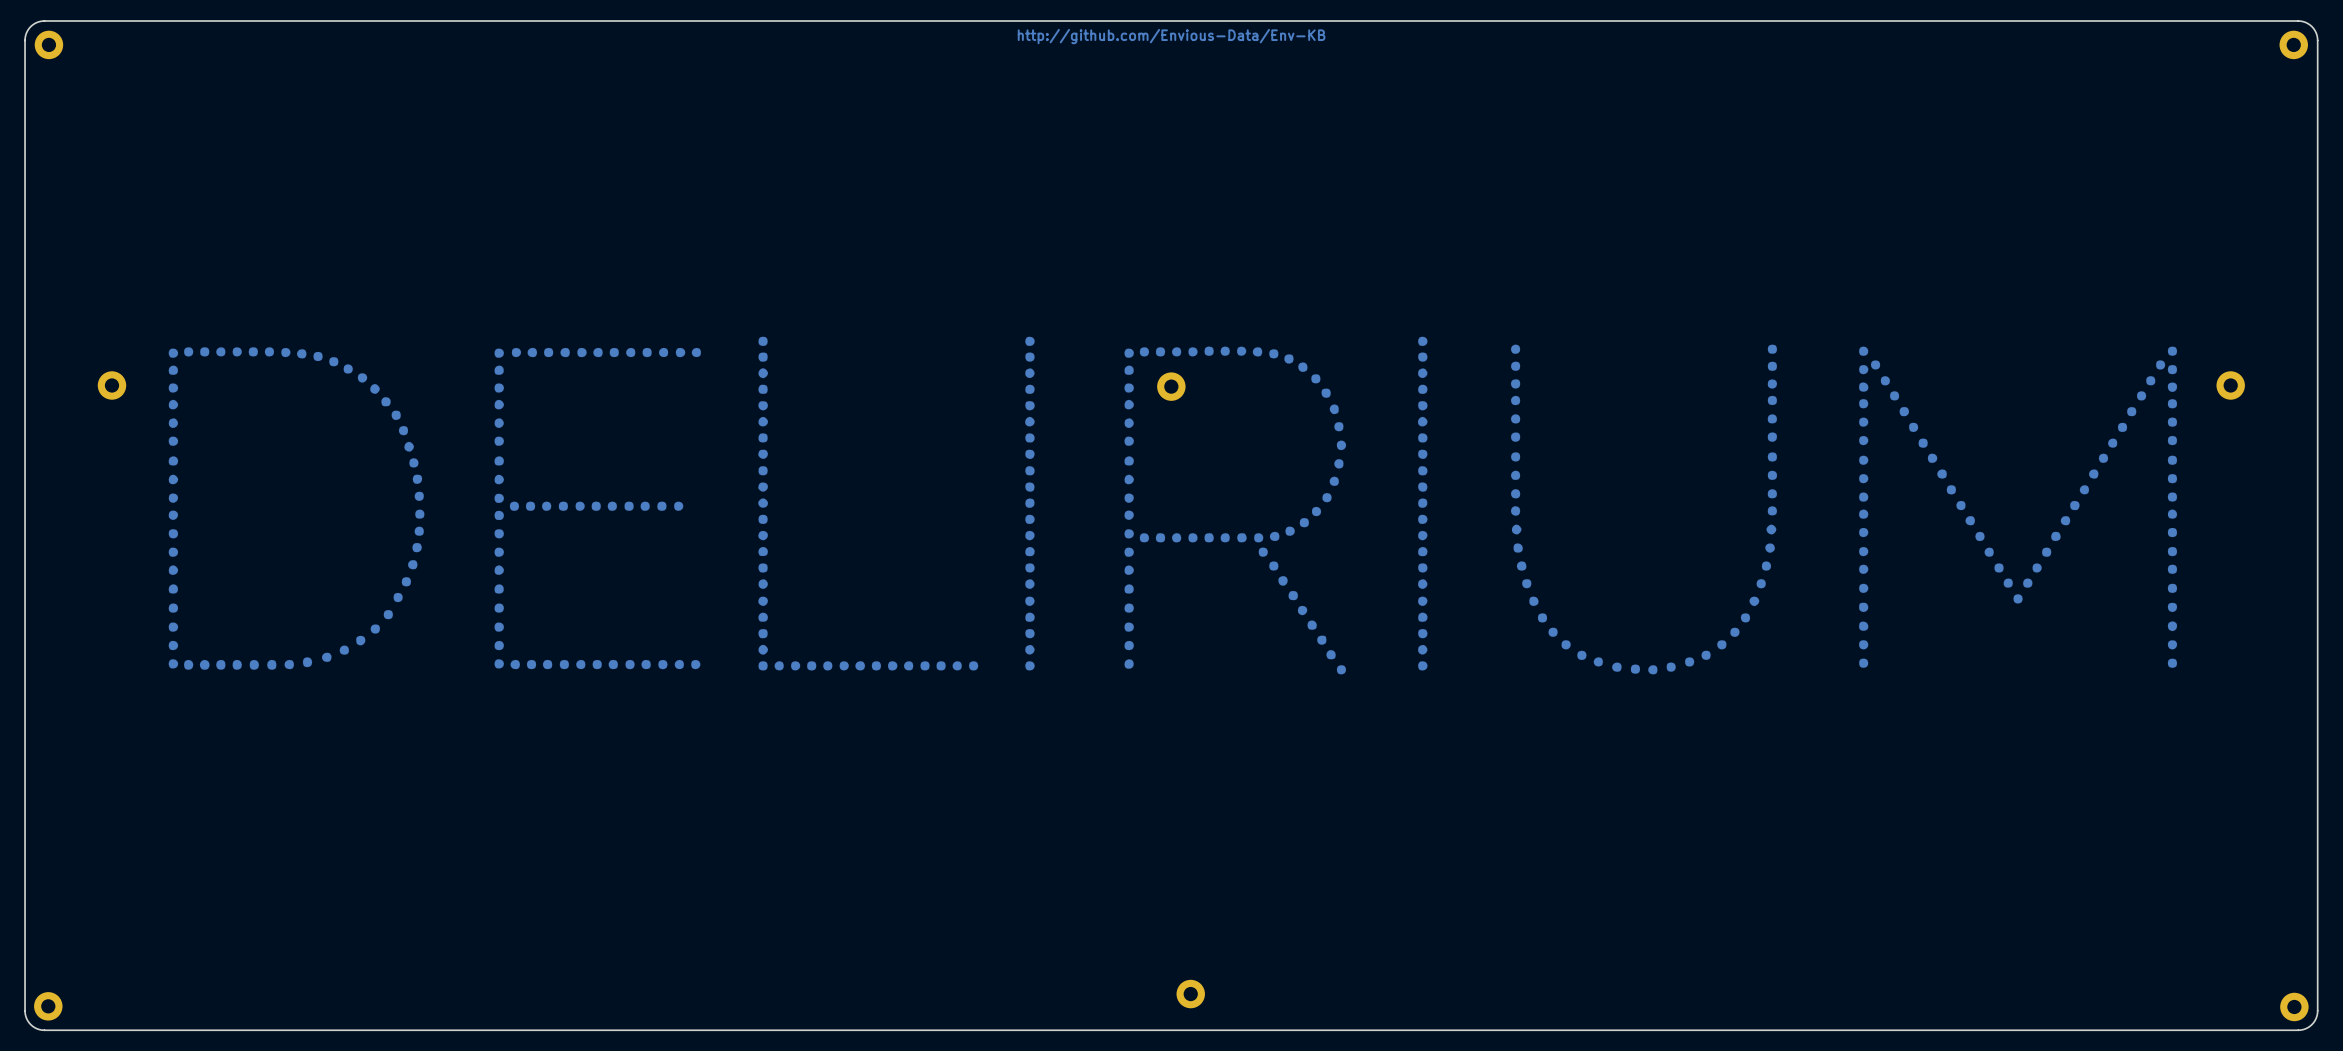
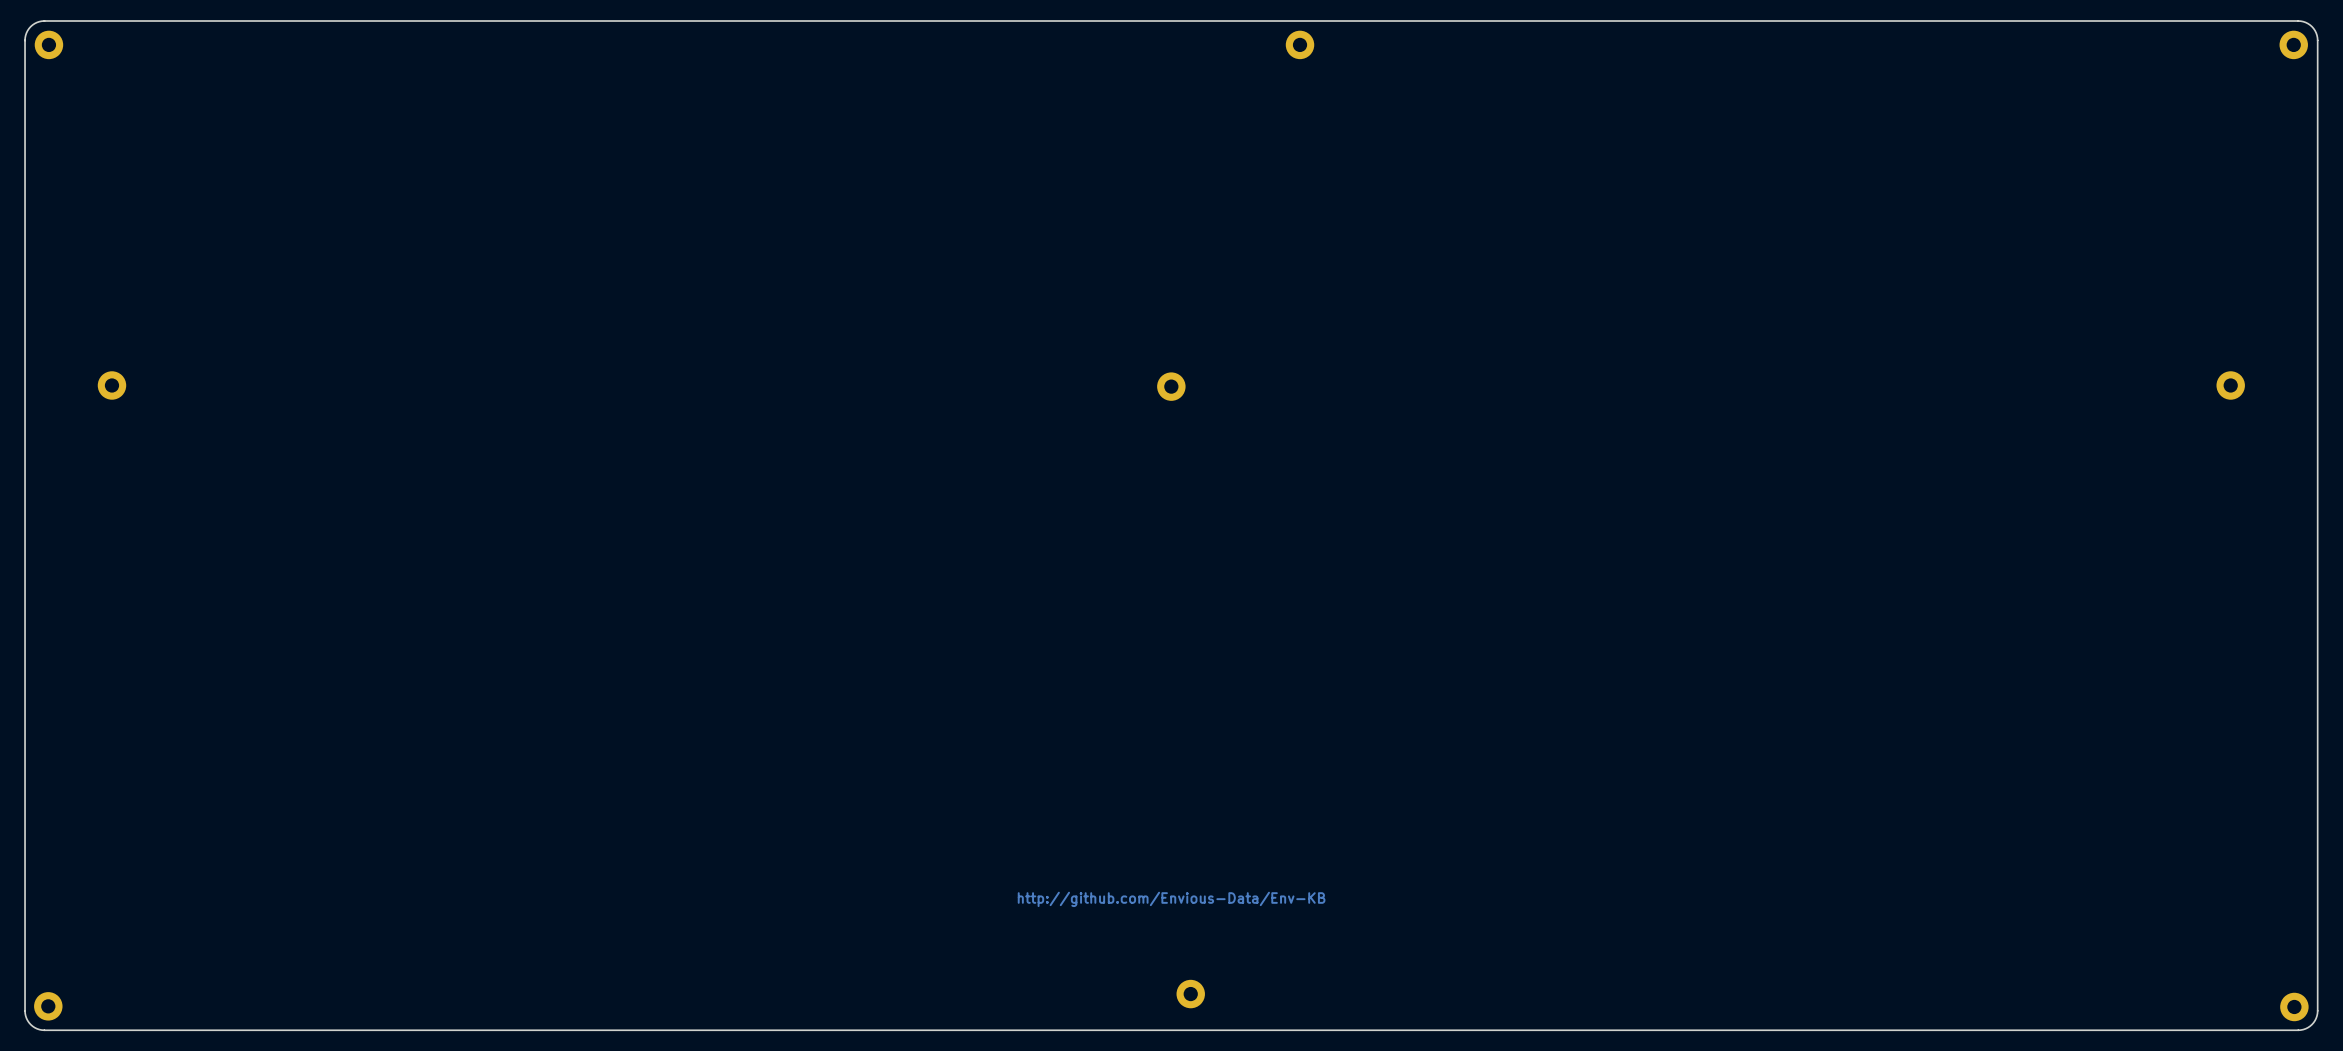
text: http://github.com/Envious-Data/Env-KB (1171, 36) -> none
part: none -> (1300, 44)
drawing: [168, 336, 2178, 675] -> none
text: none -> http://github.com/Envious-Data/Env-KB (1171, 899)

